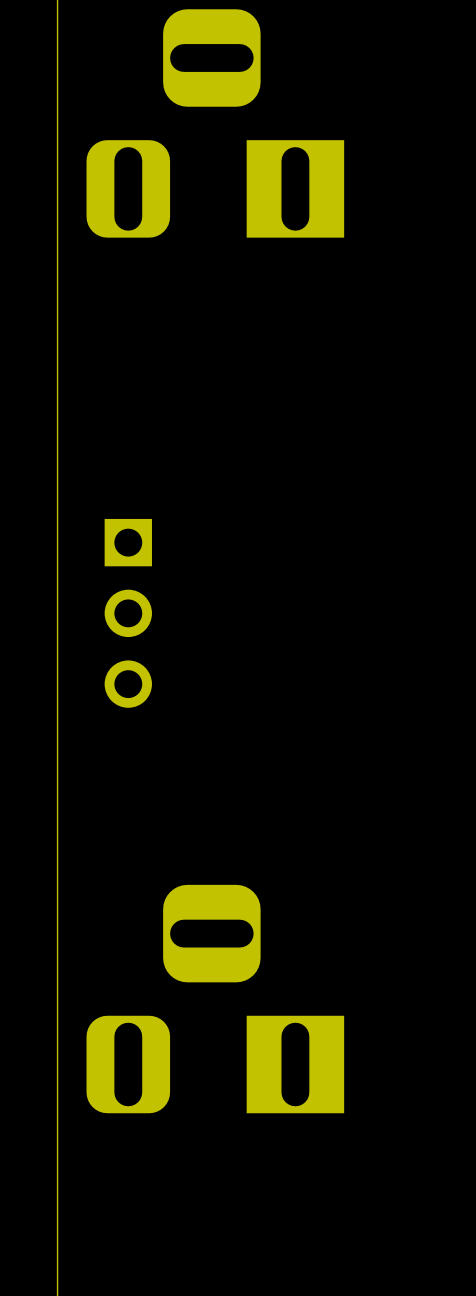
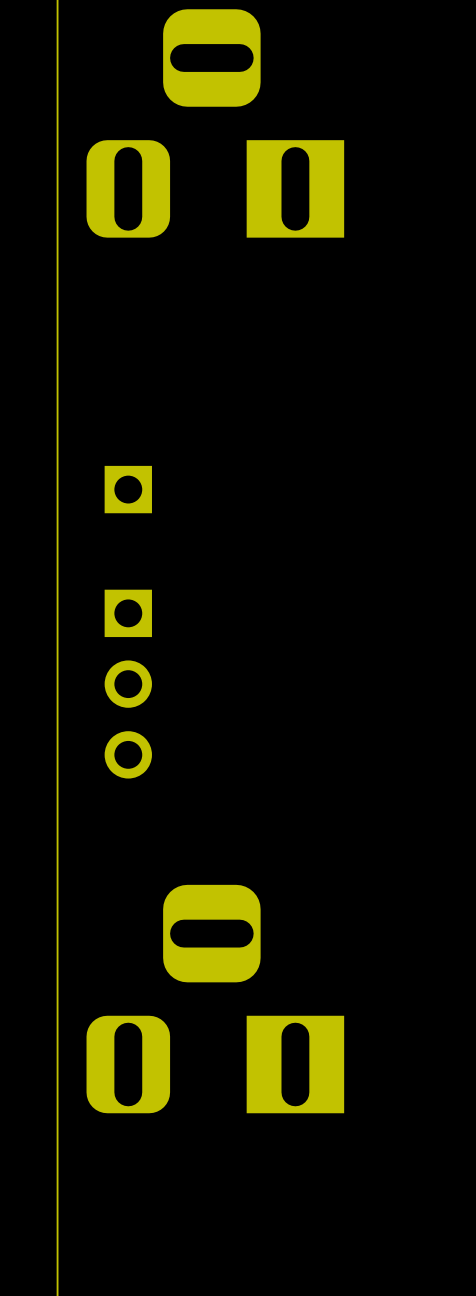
part: none -> (128, 489)
part position: (128, 613) -> (128, 684)

